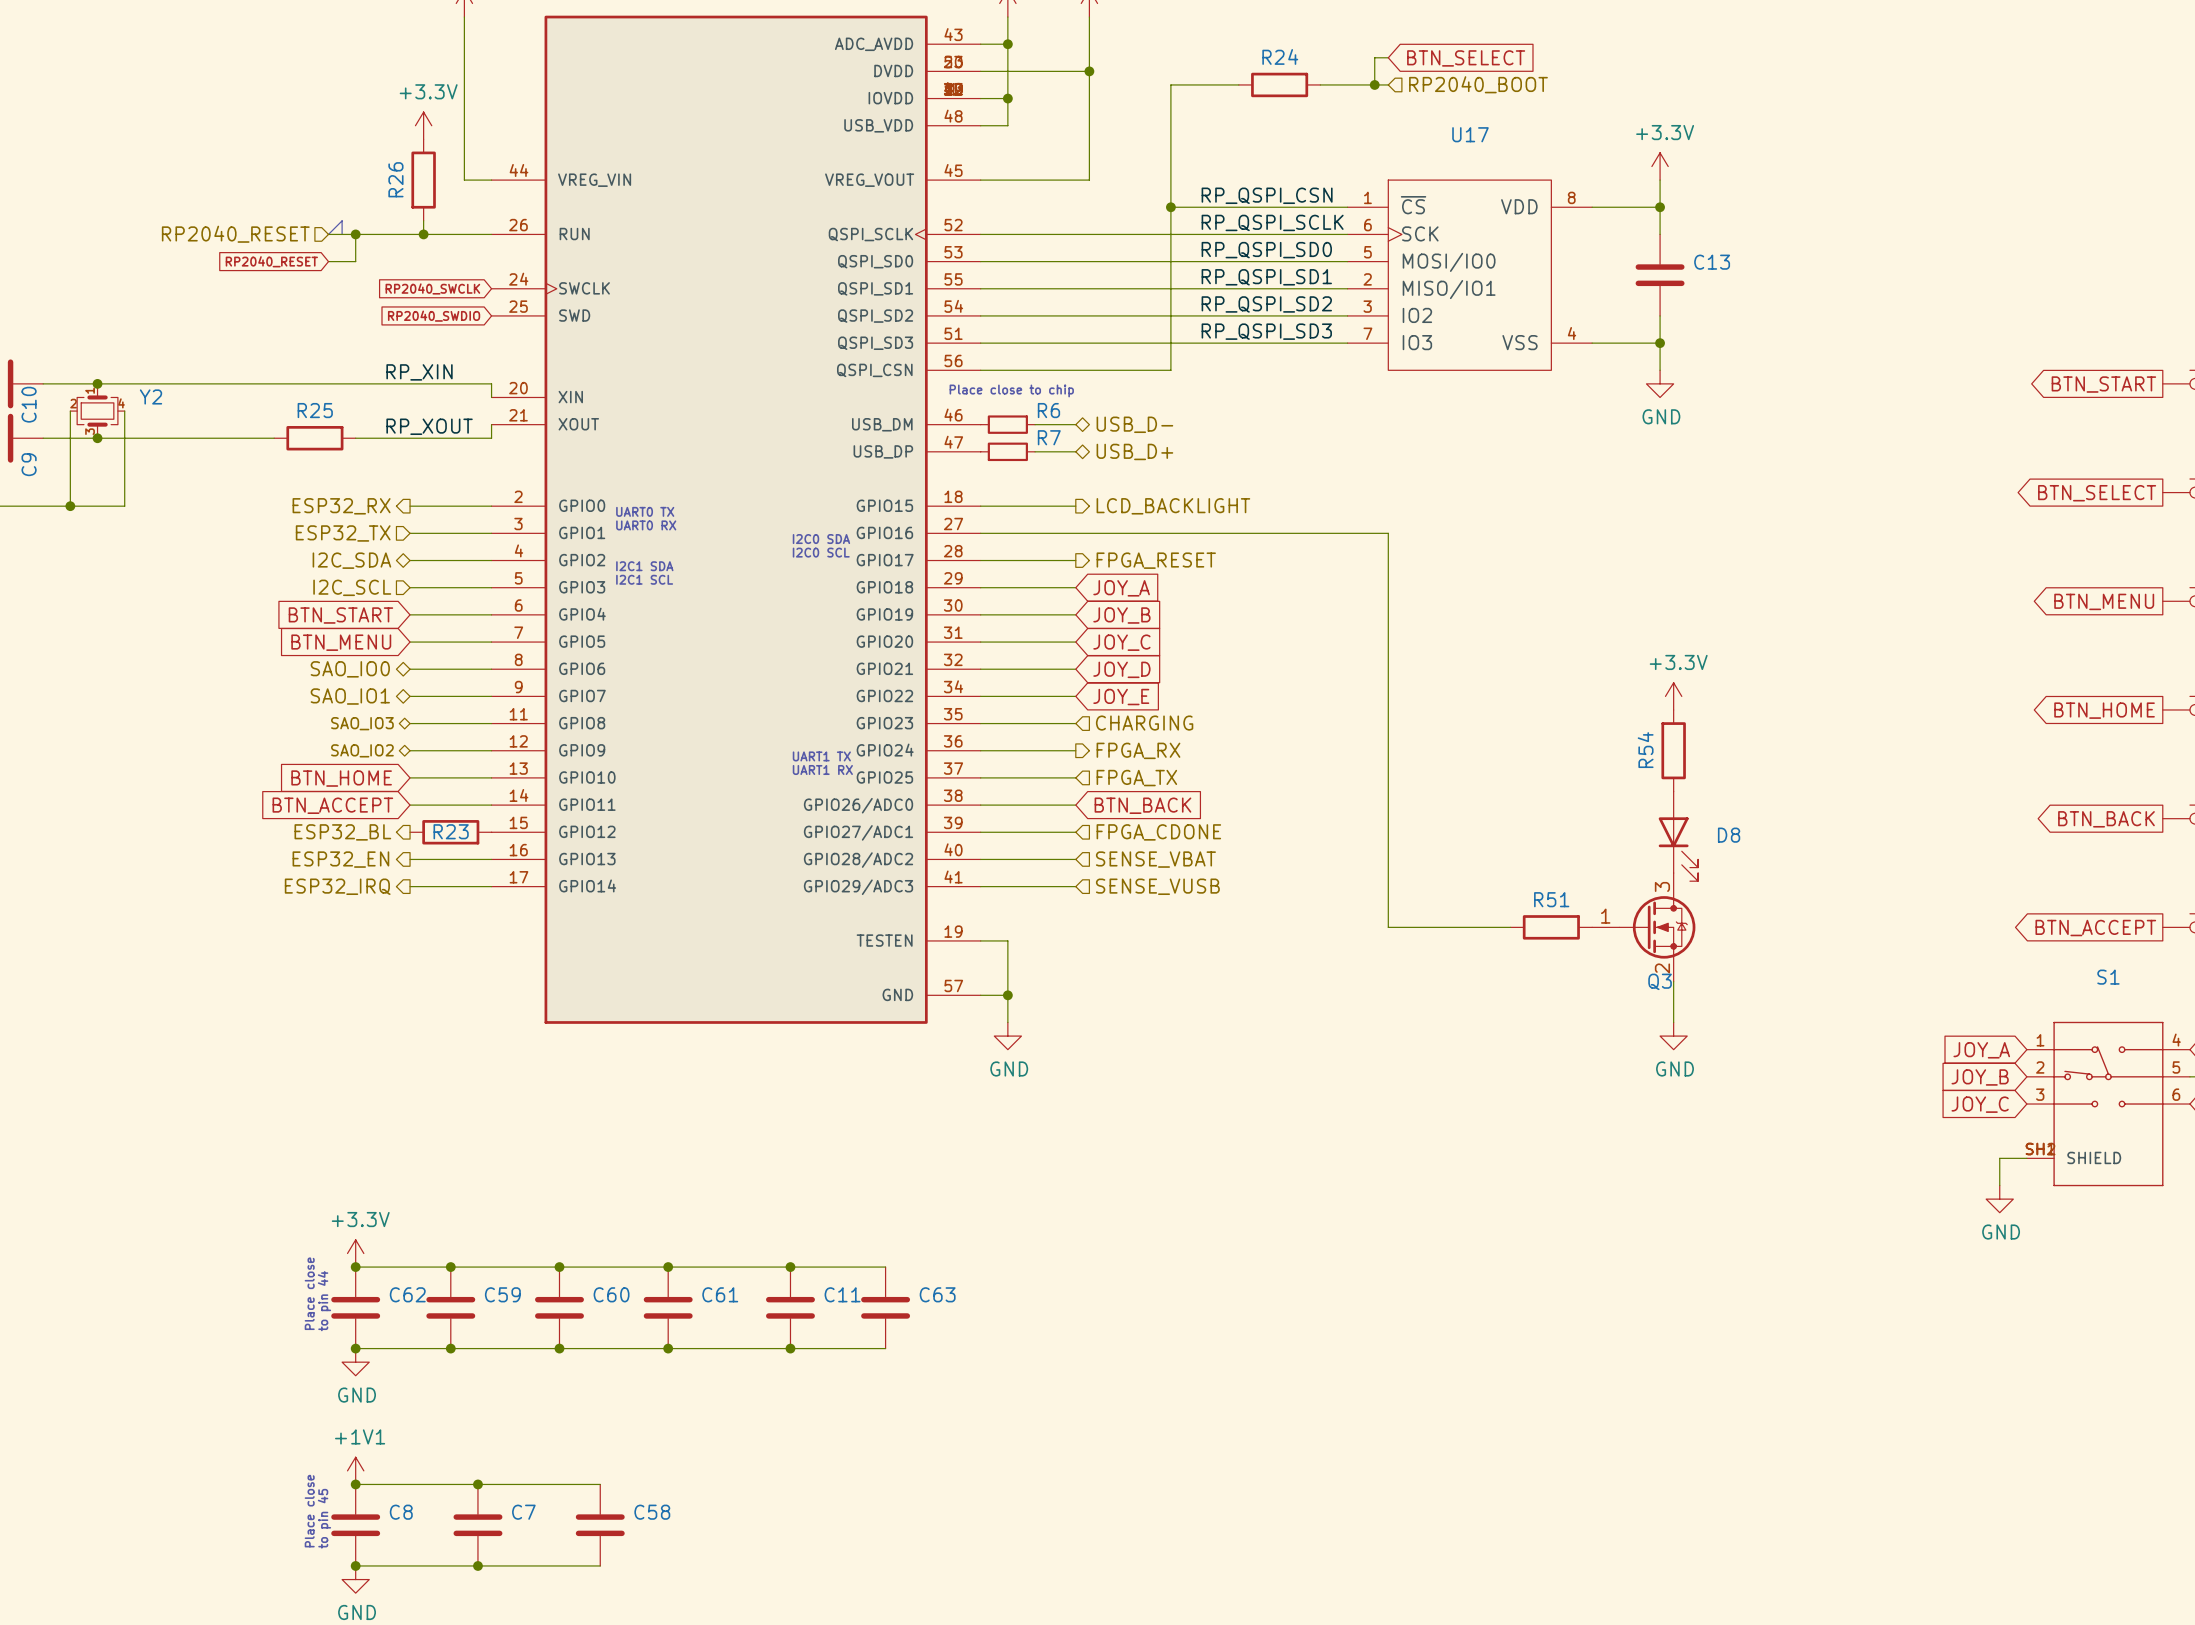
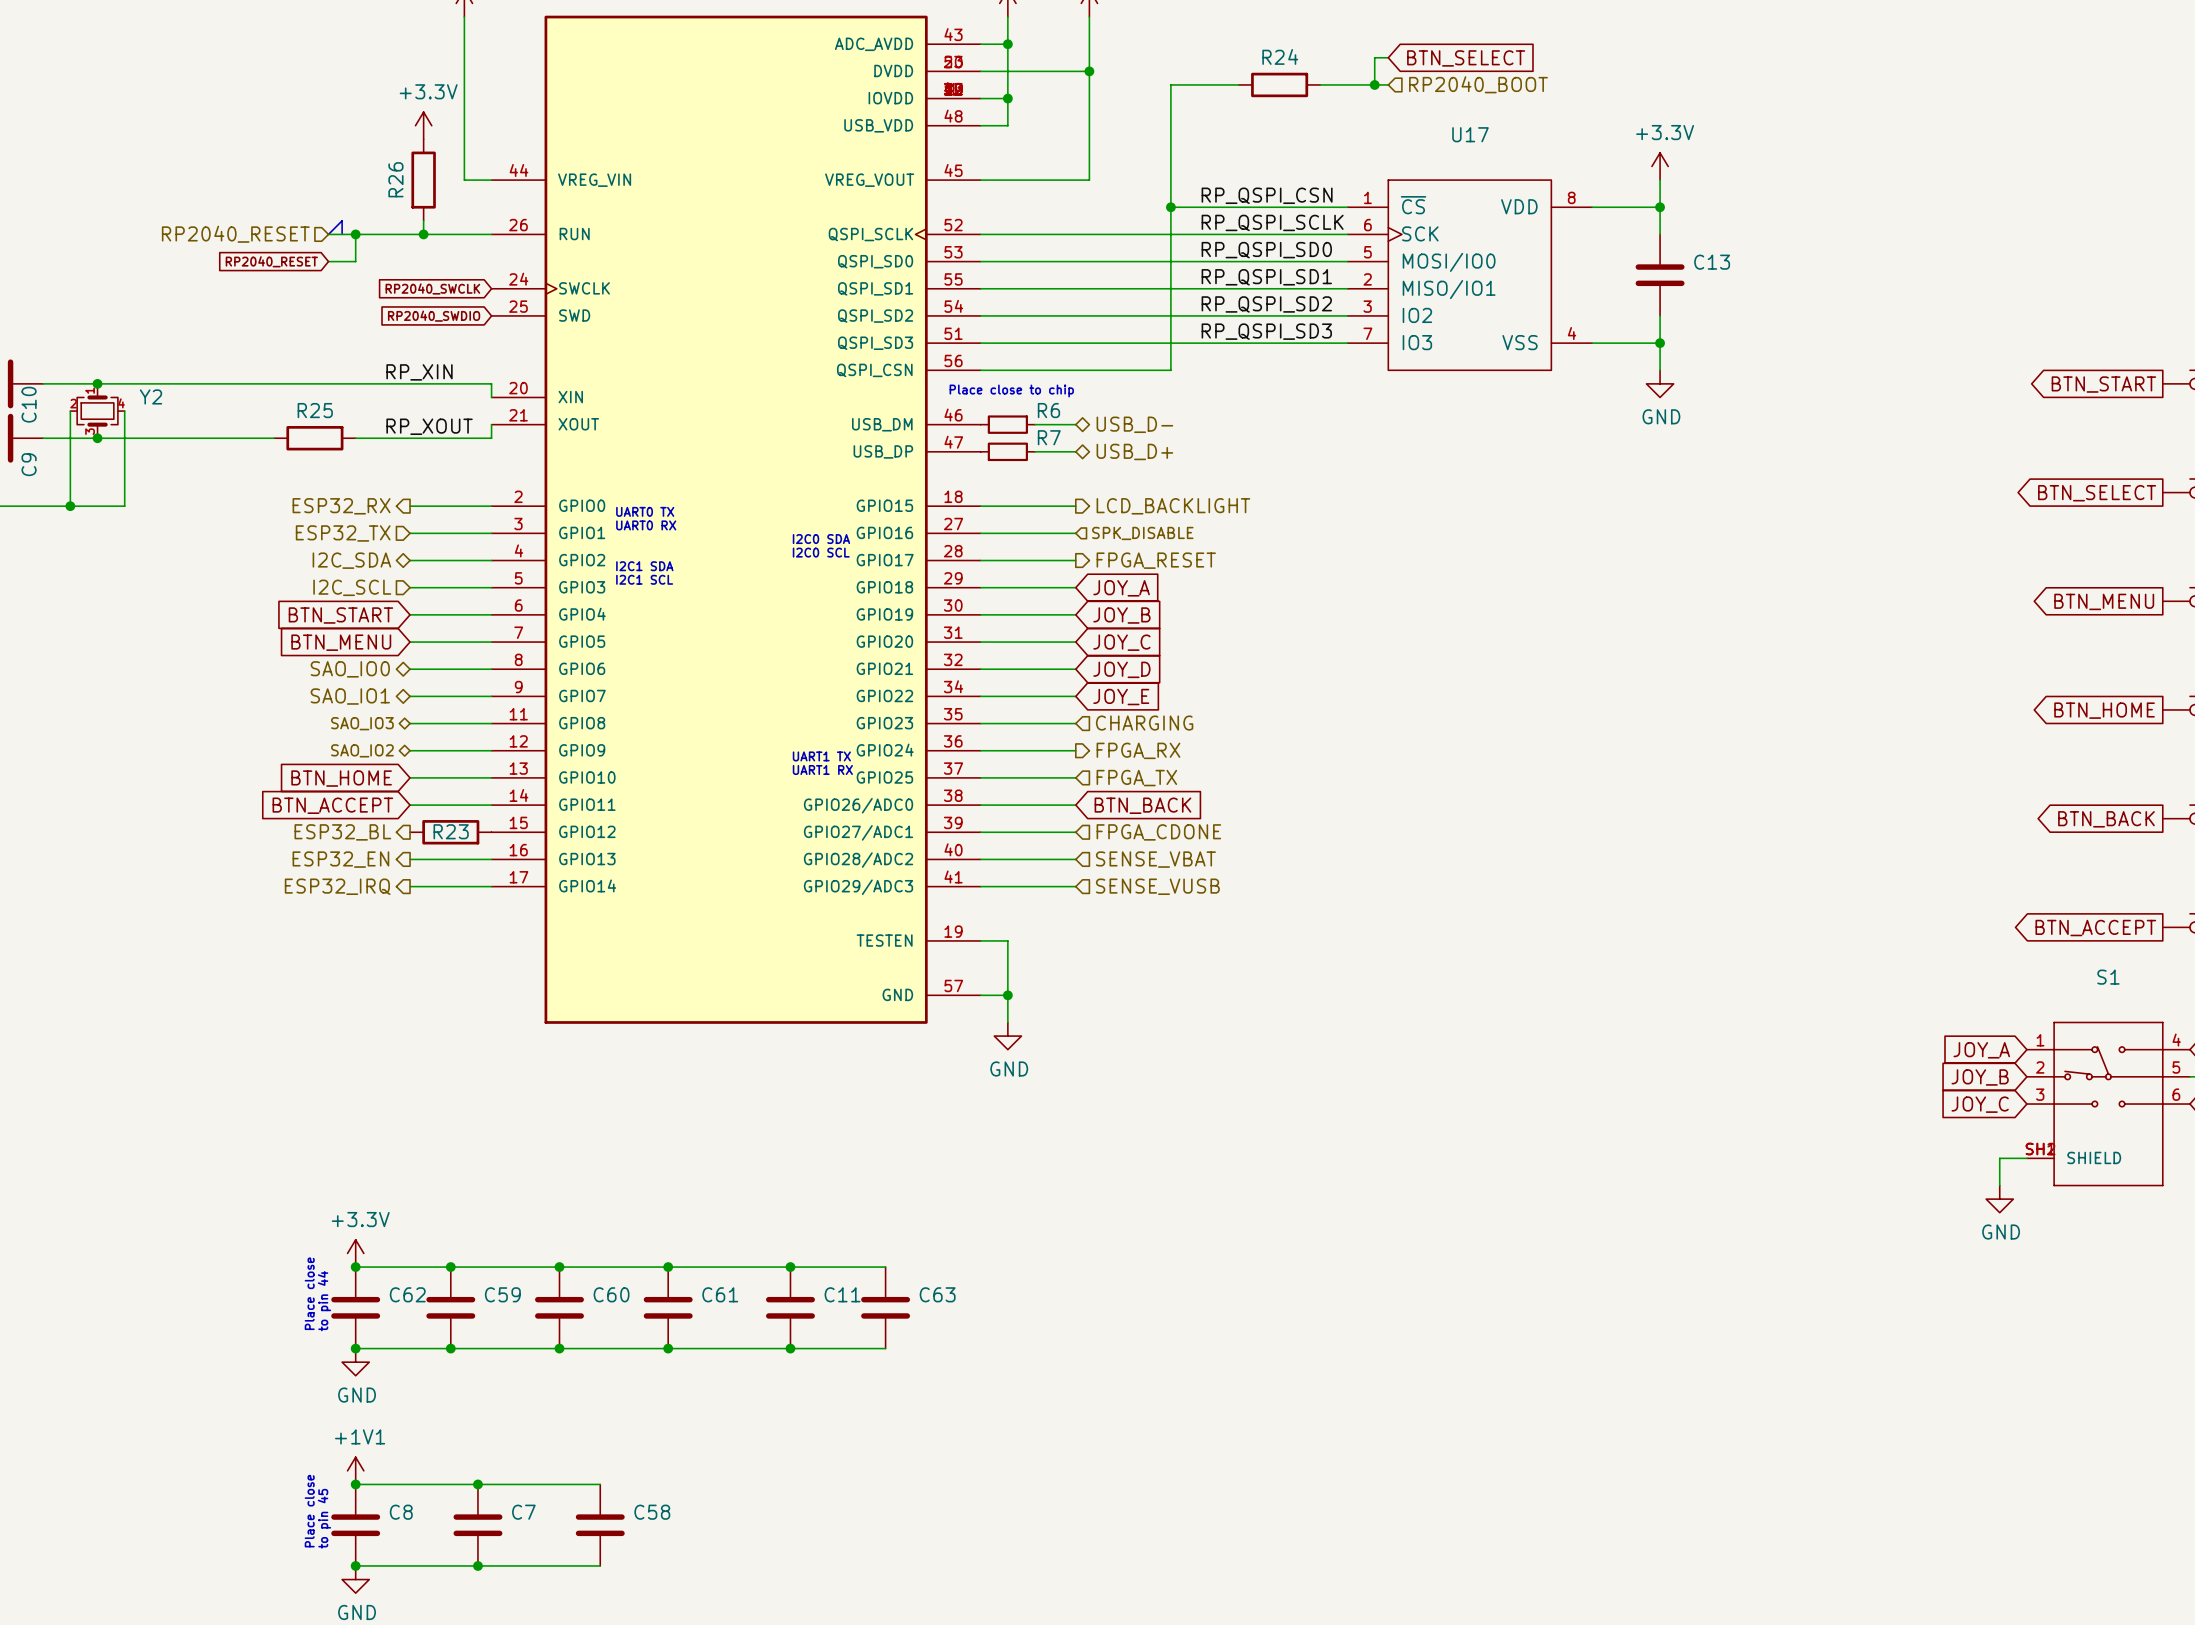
wire: (1075, 533) (1388, 533) (1388, 927) (1510, 927) -> none
hierarchical label: none -> SPK_DISABLE (1142, 533)
power symbol: +3.3V (1673, 696) -> none
R54: (1673, 750) -> none
D8: (1678, 836) -> none
R51: (1551, 927) -> none
Q3: (1643, 927) -> none
wire: (1673, 981) (1673, 1022) -> none
power symbol: GND (1673, 1036) -> none

